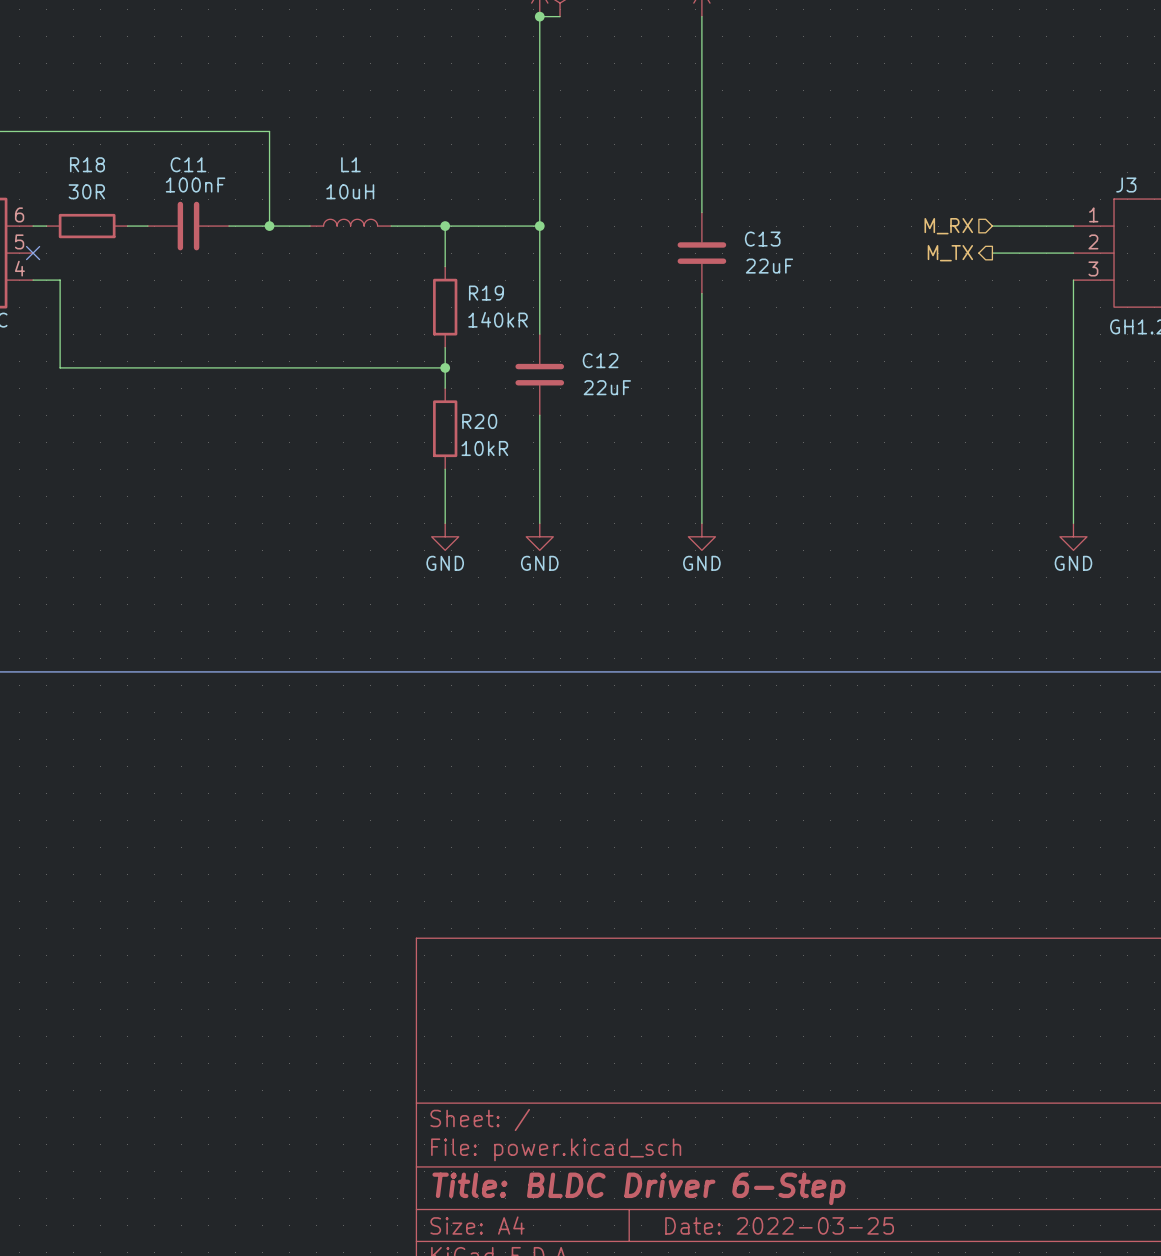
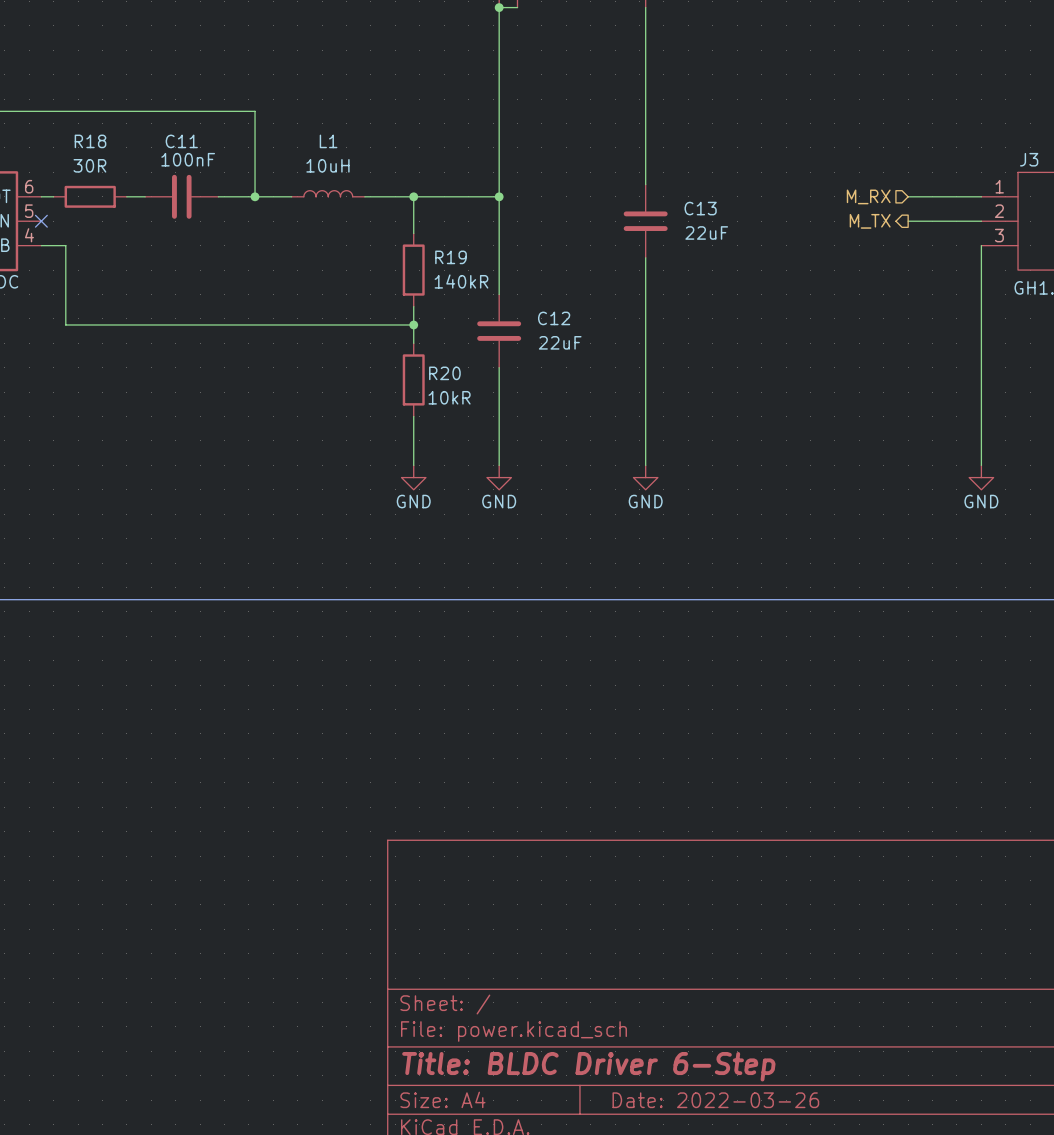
title block: Date: 2022-03-25 (779, 1225) -> Date: 2022-03-26 (715, 1100)

